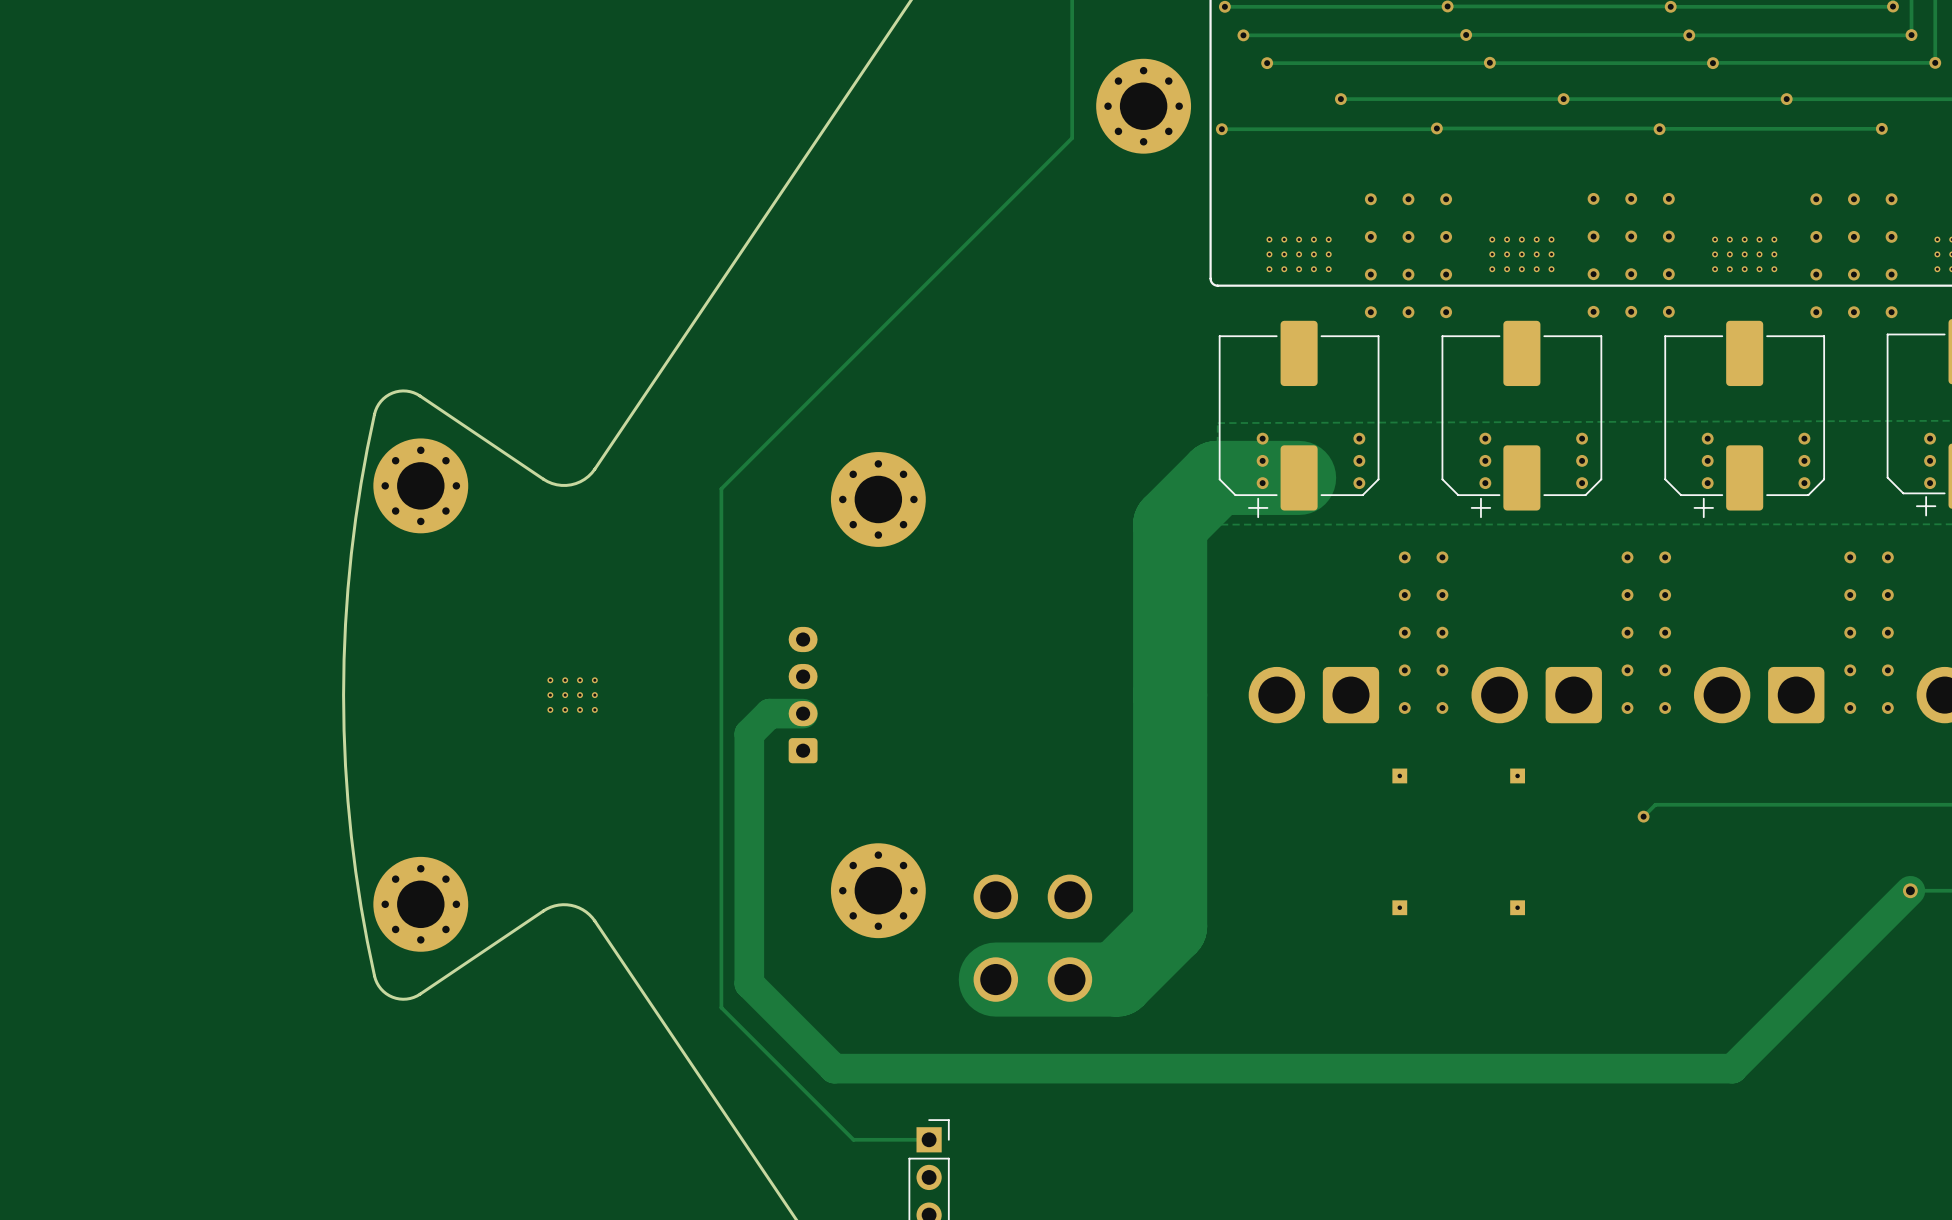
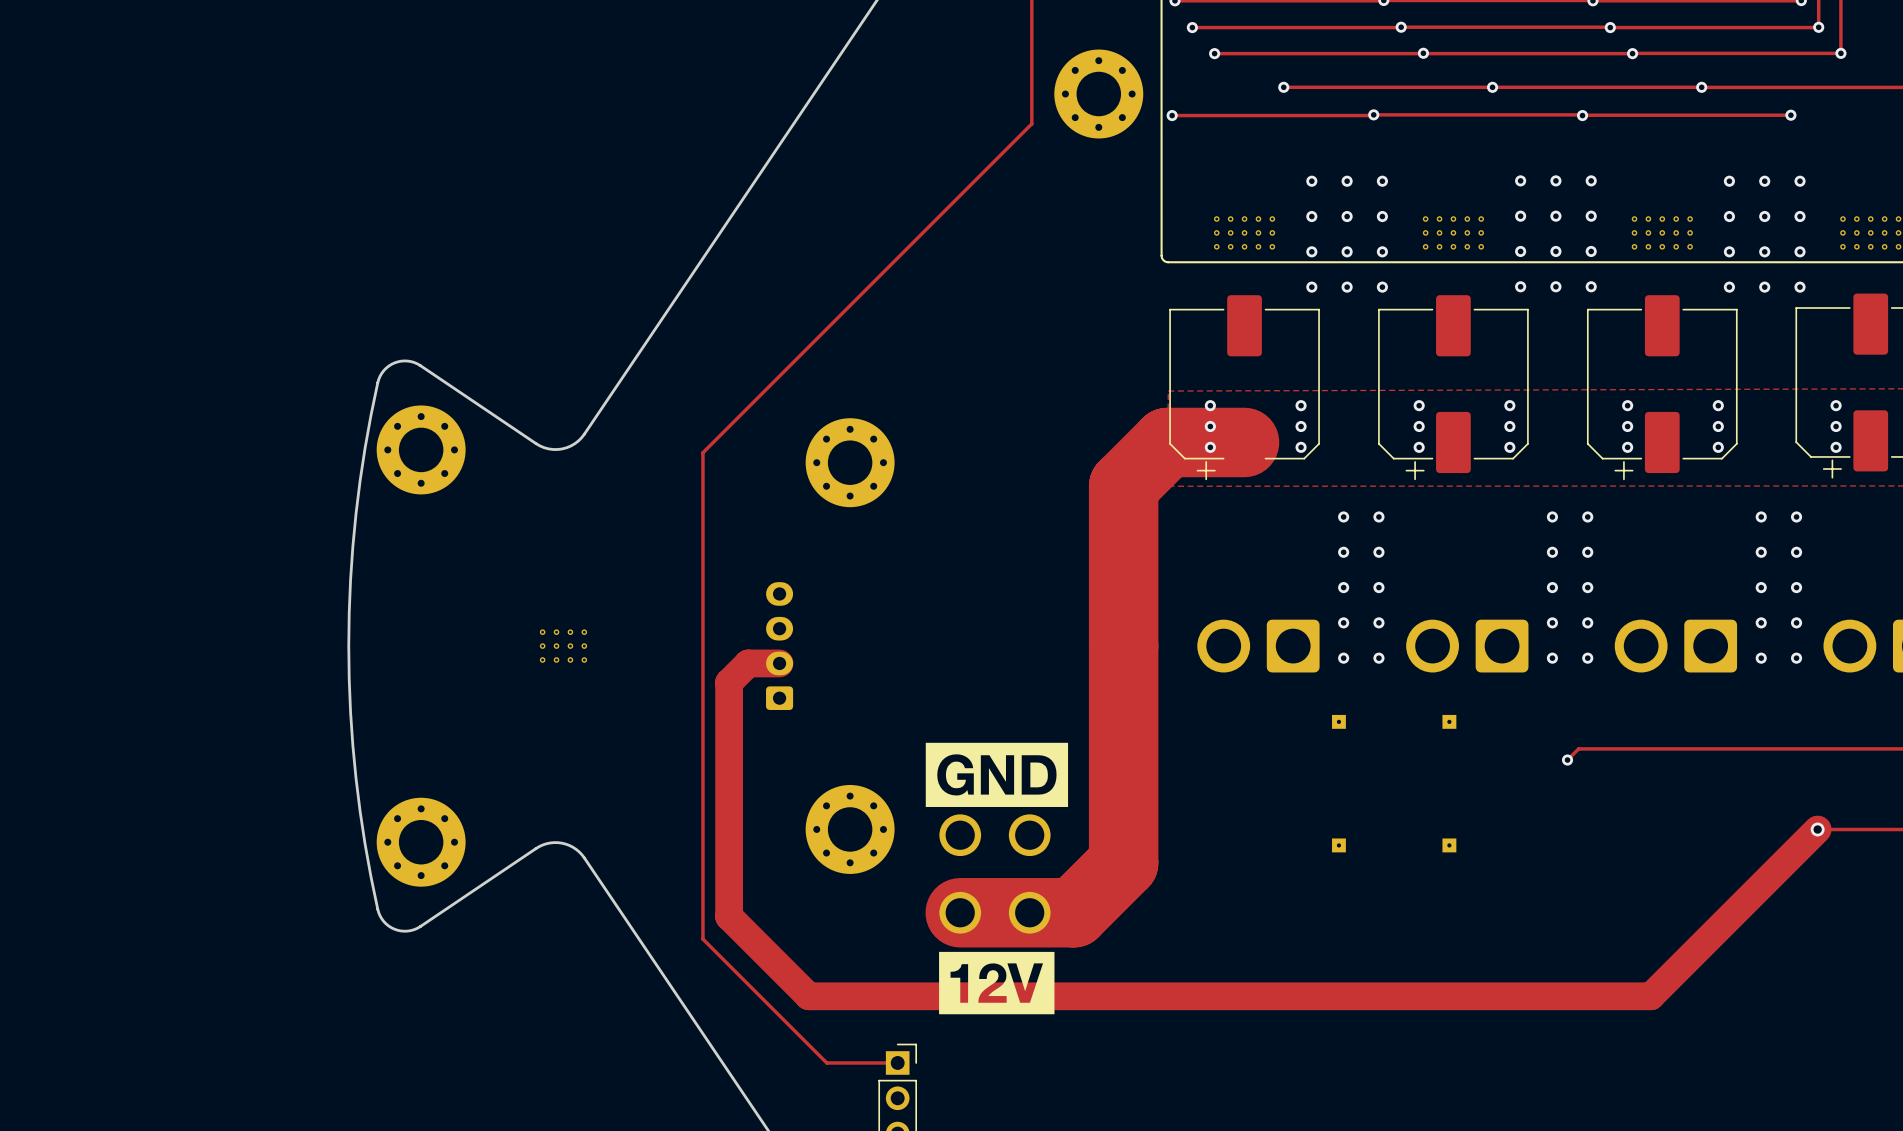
drawing: none -> [925, 742, 1069, 807]
drawing: none -> [939, 951, 1055, 1015]

